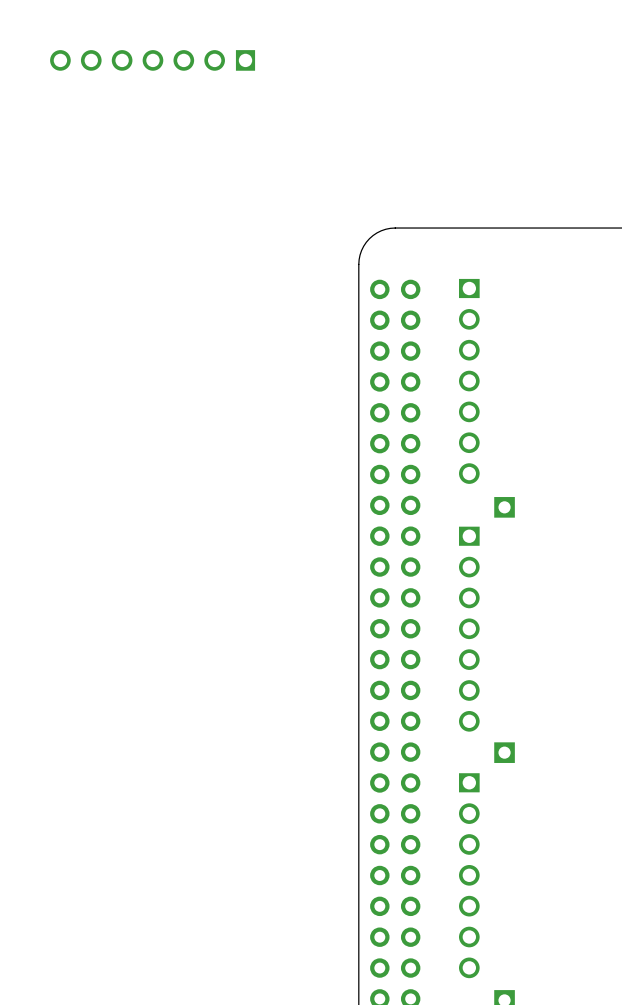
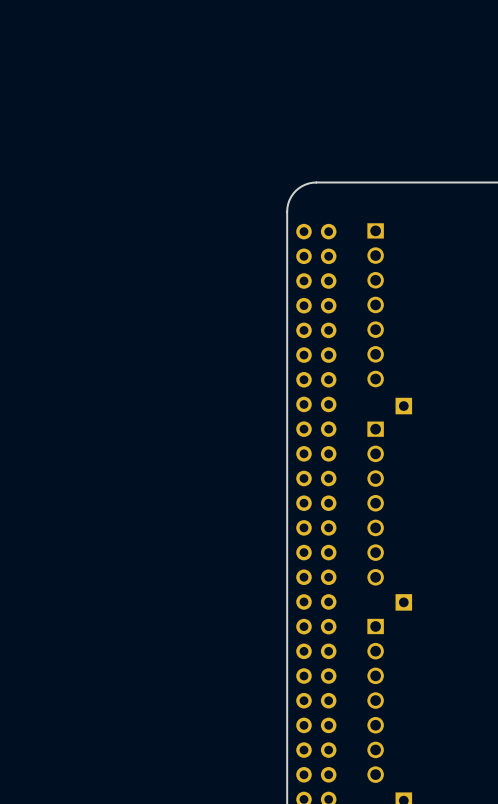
part: (152, 60) -> none

